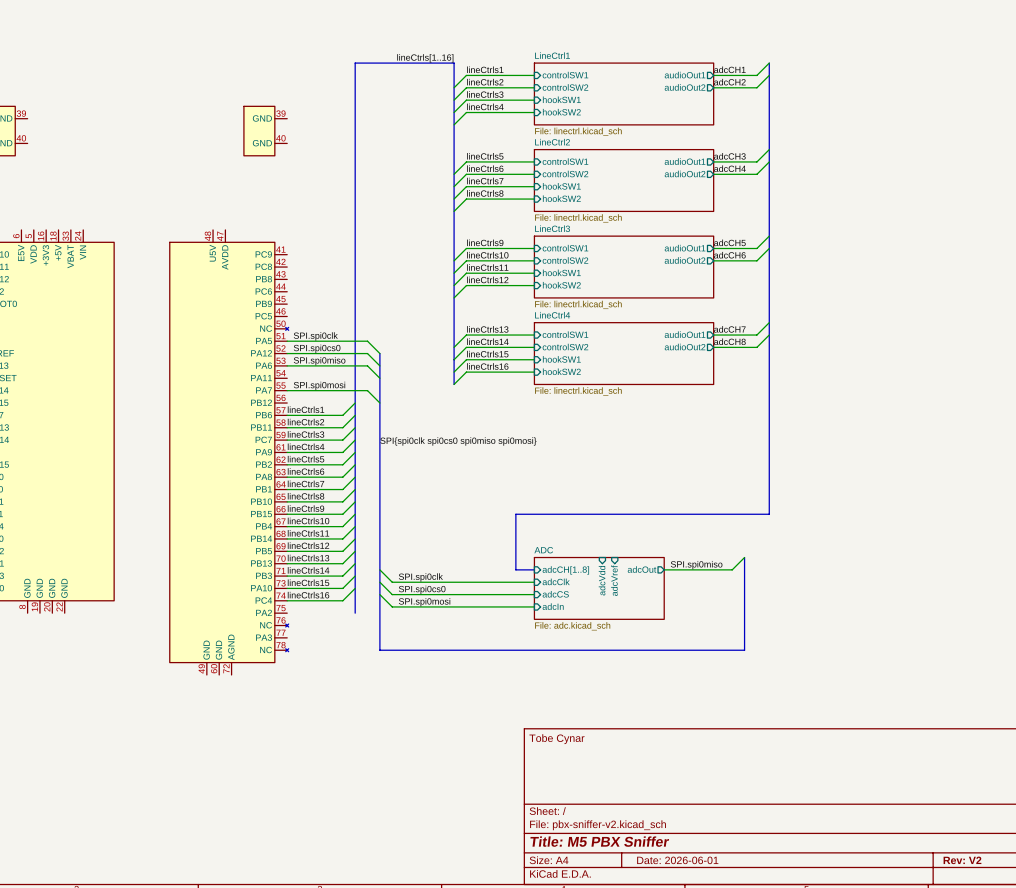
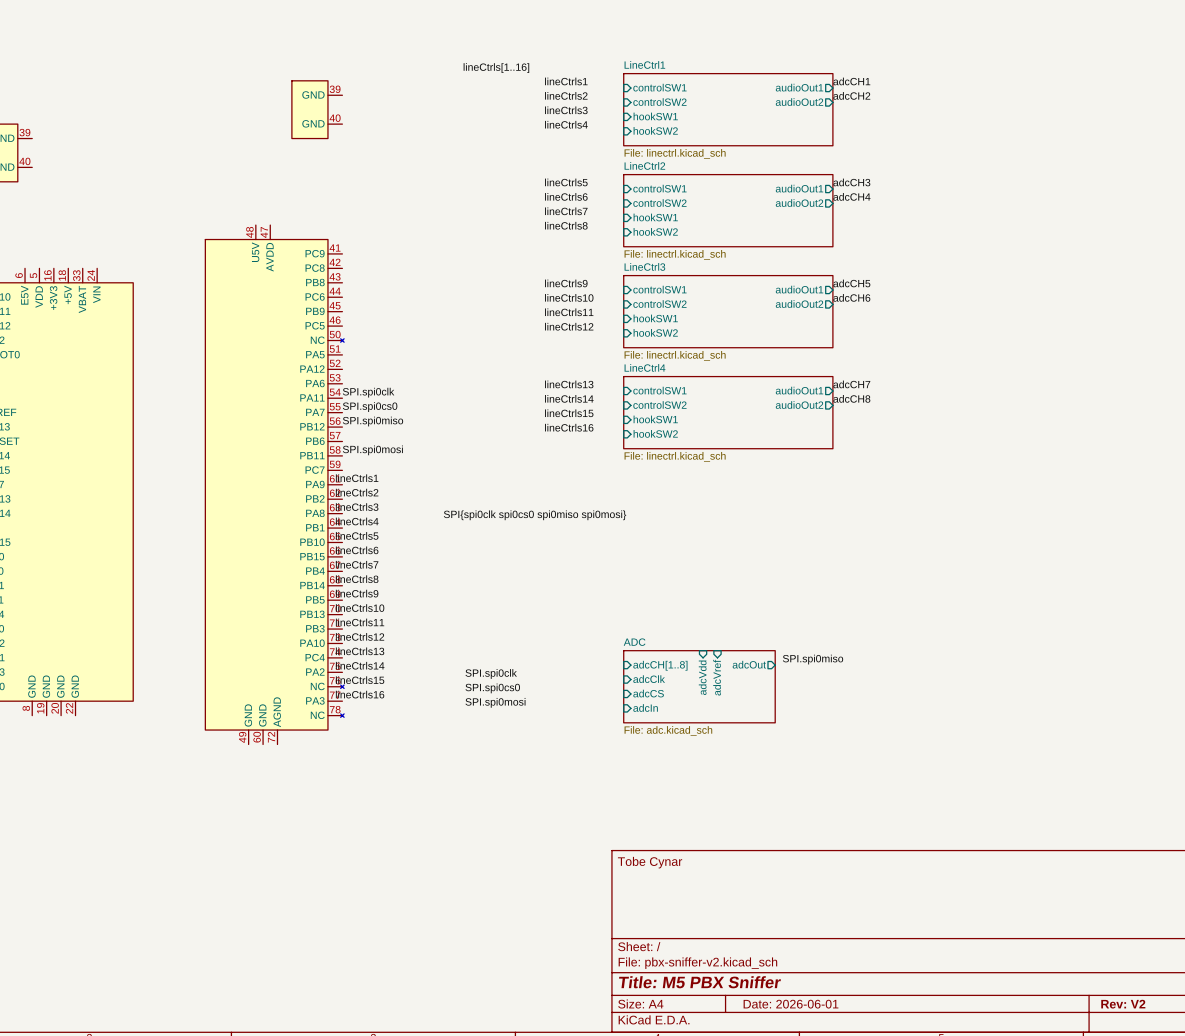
wire: (769, 63) (756, 75) (713, 75) -> none
bus: (769, 63) (769, 514) (515, 514) (515, 569) (534, 569) -> none
wire: (534, 75) (466, 75) (454, 87) -> none
wire: (769, 75) (756, 87) (713, 87) -> none
wire: (534, 87) (466, 87) (454, 100) -> none
wire: (534, 100) (466, 100) (454, 112) -> none
wire: (534, 112) (466, 112) (454, 124) -> none
part position: (265, 131) -> (317, 109)
wire: (769, 149) (756, 161) (713, 161) -> none
wire: (534, 161) (466, 161) (454, 174) -> none
wire: (769, 161) (756, 174) (713, 174) -> none
wire: (534, 174) (466, 174) (454, 186) -> none
wire: (534, 186) (466, 186) (454, 199) -> none
wire: (534, 199) (466, 199) (454, 211) -> none
wire: (769, 236) (756, 248) (713, 248) -> none
wire: (534, 248) (466, 248) (454, 260) -> none
wire: (769, 248) (756, 260) (713, 260) -> none
wire: (534, 260) (466, 260) (454, 273) -> none
wire: (534, 273) (466, 273) (454, 285) -> none
wire: (534, 285) (466, 285) (454, 297) -> none
wire: (769, 322) (756, 335) (713, 335) -> none
wire: (534, 335) (466, 335) (454, 347) -> none
wire: (769, 335) (756, 347) (713, 347) -> none
wire: (287, 341) (367, 341) (379, 353) -> none
wire: (534, 347) (466, 347) (454, 359) -> none
wire: (287, 353) (367, 353) (379, 365) -> none
bus: (379, 353) (379, 650) (744, 650) (744, 557) -> none
wire: (534, 359) (466, 359) (454, 372) -> none
wire: (287, 365) (367, 365) (379, 378) -> none
wire: (534, 372) (466, 372) (454, 384) -> none
bus: (454, 384) (454, 63) (355, 63) (355, 613) -> none
wire: (287, 390) (367, 390) (379, 403) -> none
wire: (355, 403) (342, 415) (287, 415) -> none
wire: (355, 415) (342, 427) (287, 427) -> none
wire: (355, 427) (342, 440) (287, 440) -> none
wire: (355, 440) (342, 452) (287, 452) -> none
part position: (229, 452) -> (274, 484)
wire: (355, 452) (342, 464) (287, 464) -> none
wire: (355, 464) (342, 477) (287, 477) -> none
wire: (355, 477) (342, 489) (287, 489) -> none
wire: (355, 489) (342, 501) (287, 501) -> none
wire: (355, 501) (342, 514) (287, 514) -> none
wire: (355, 514) (342, 526) (287, 526) -> none
wire: (355, 526) (342, 538) (287, 538) -> none
wire: (355, 538) (342, 551) (287, 551) -> none
wire: (355, 551) (342, 563) (287, 563) -> none
wire: (744, 557) (732, 569) (664, 569) -> none
wire: (355, 563) (342, 576) (287, 576) -> none
wire: (379, 569) (392, 582) (534, 582) -> none
wire: (355, 576) (342, 588) (287, 588) -> none
wire: (379, 582) (392, 594) (534, 594) -> none
wire: (355, 588) (342, 600) (287, 600) -> none
wire: (379, 594) (392, 606) (534, 606) -> none

